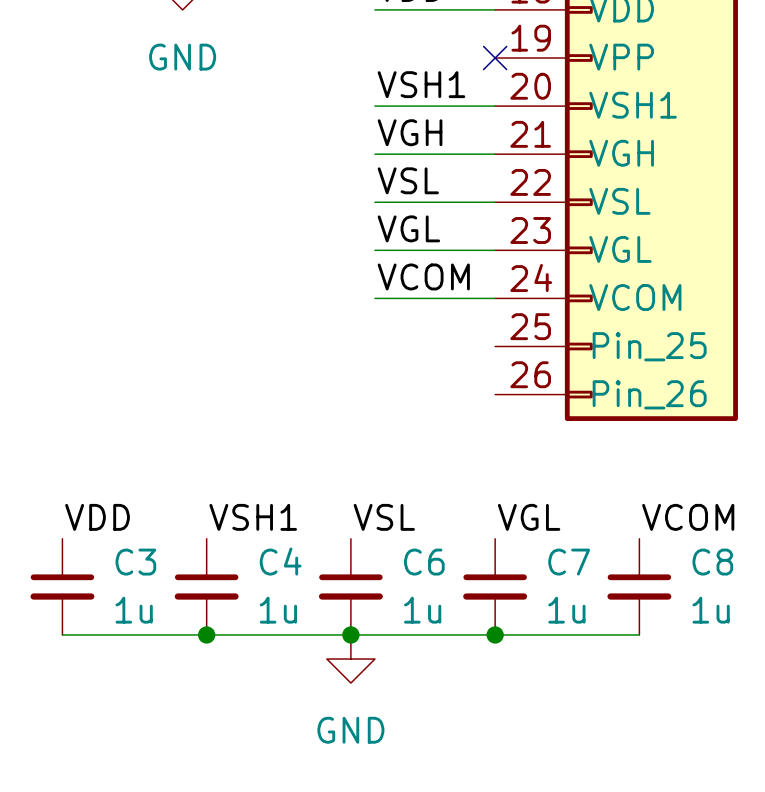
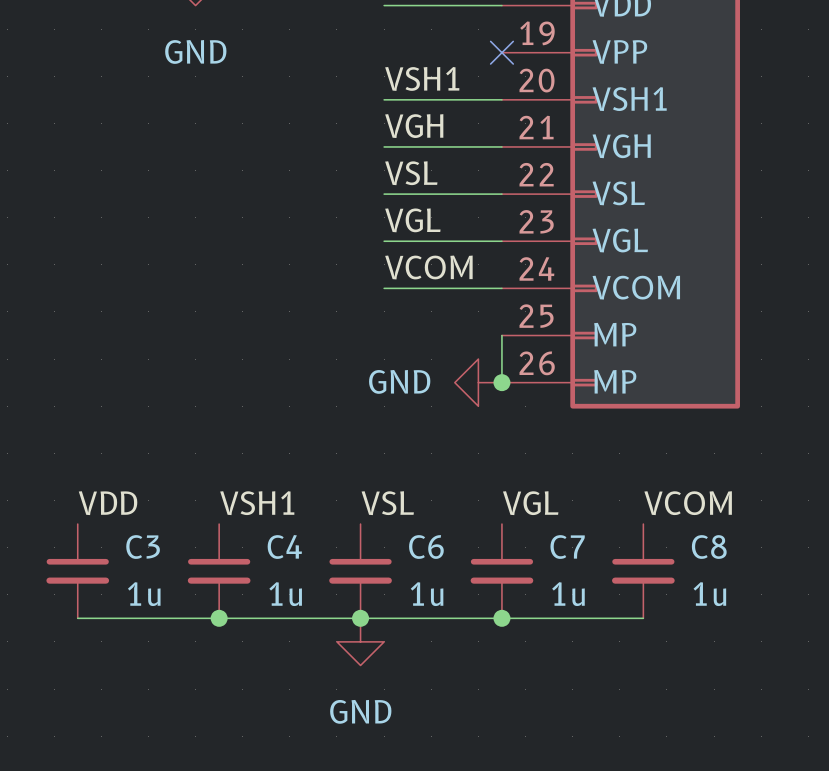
wire: none -> (501, 335) (501, 382)
part pin name: Pin_25 (649, 346) -> MP (615, 334)
power symbol: none -> GND (478, 382)
junction: none -> (501, 382)
part pin name: Pin_26 (649, 394) -> MP (615, 381)

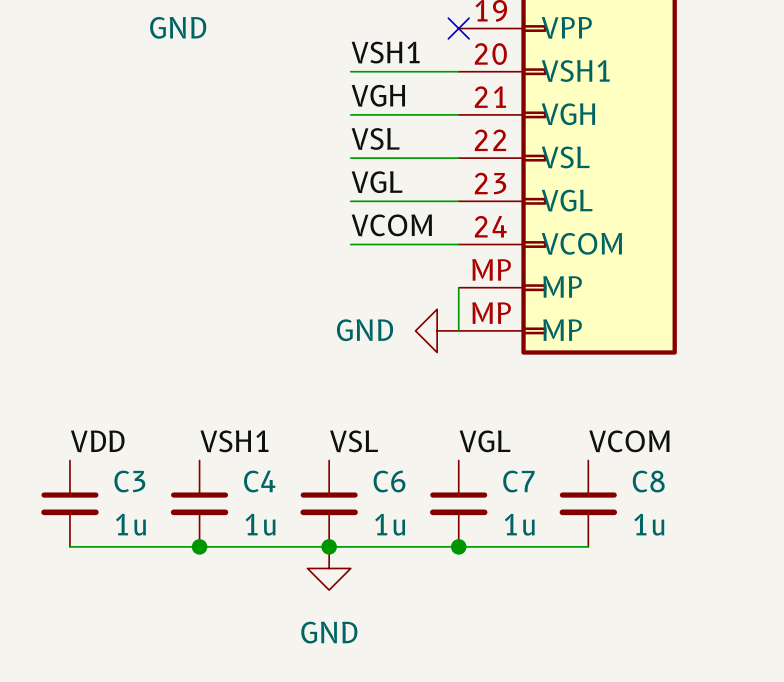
part pin number: 25 (536, 316) -> MP (491, 269)
part pin number: 26 (537, 363) -> MP (491, 313)
junction: (501, 382) -> none

